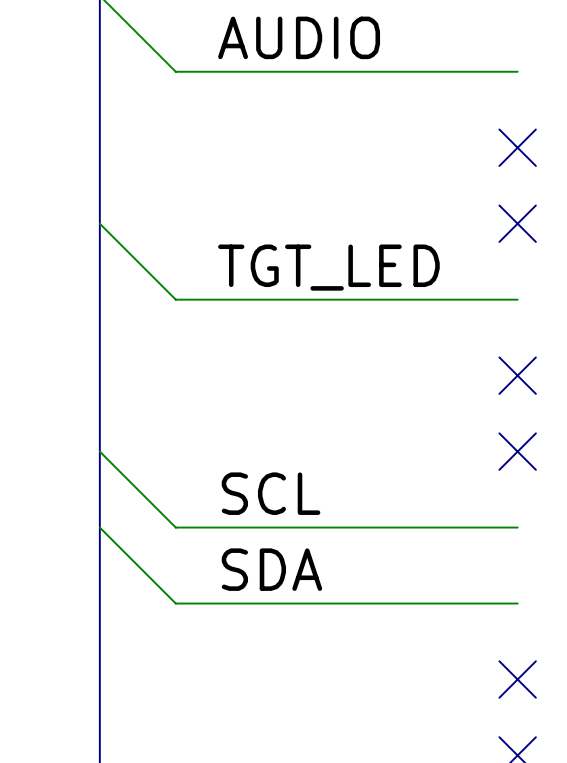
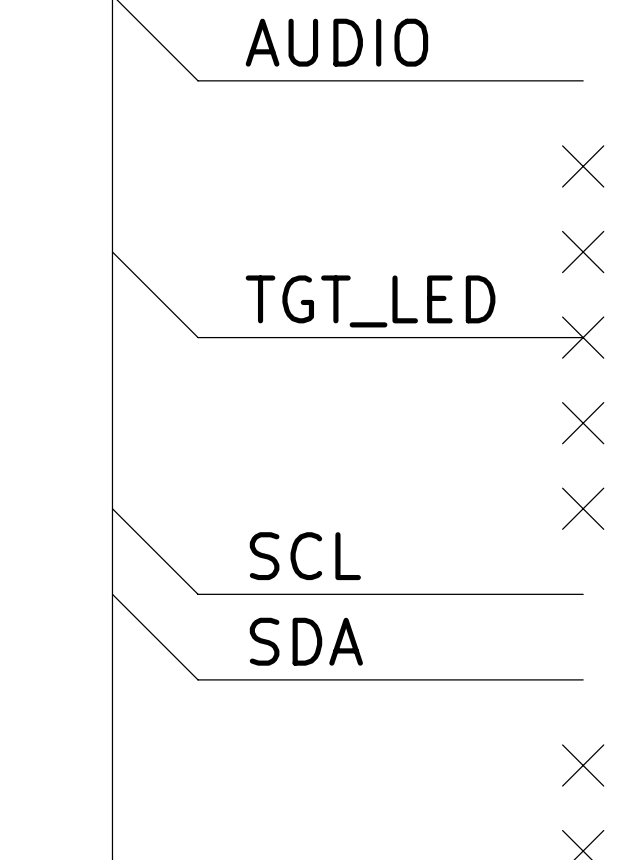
no-connect mark: none -> (583, 337)

